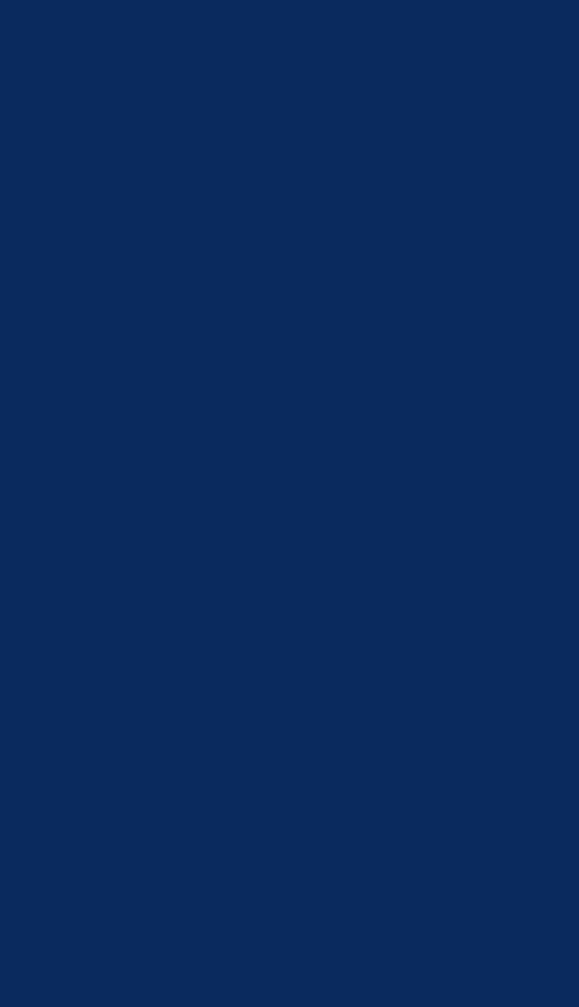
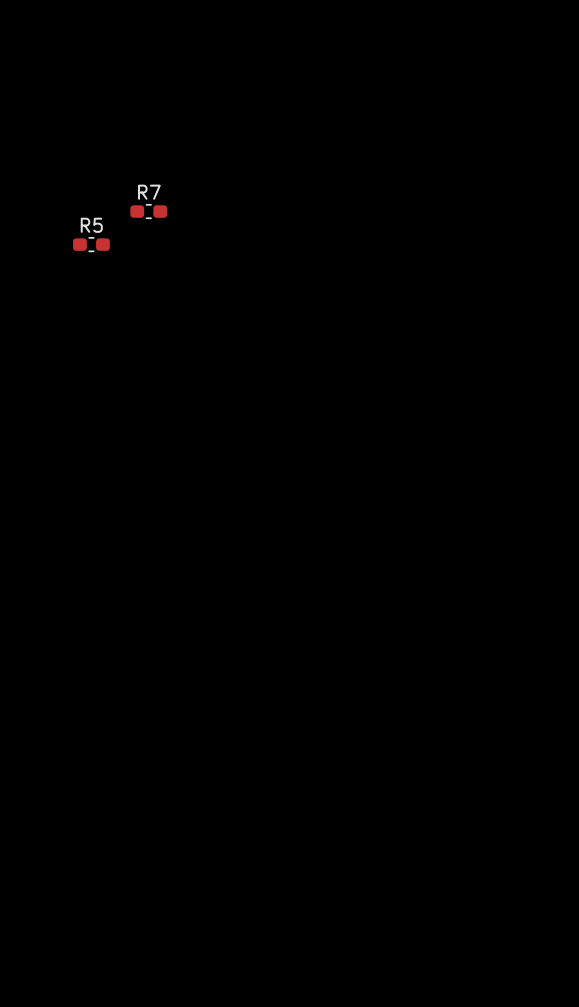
R7: none -> (148, 211)
R5: none -> (91, 244)

